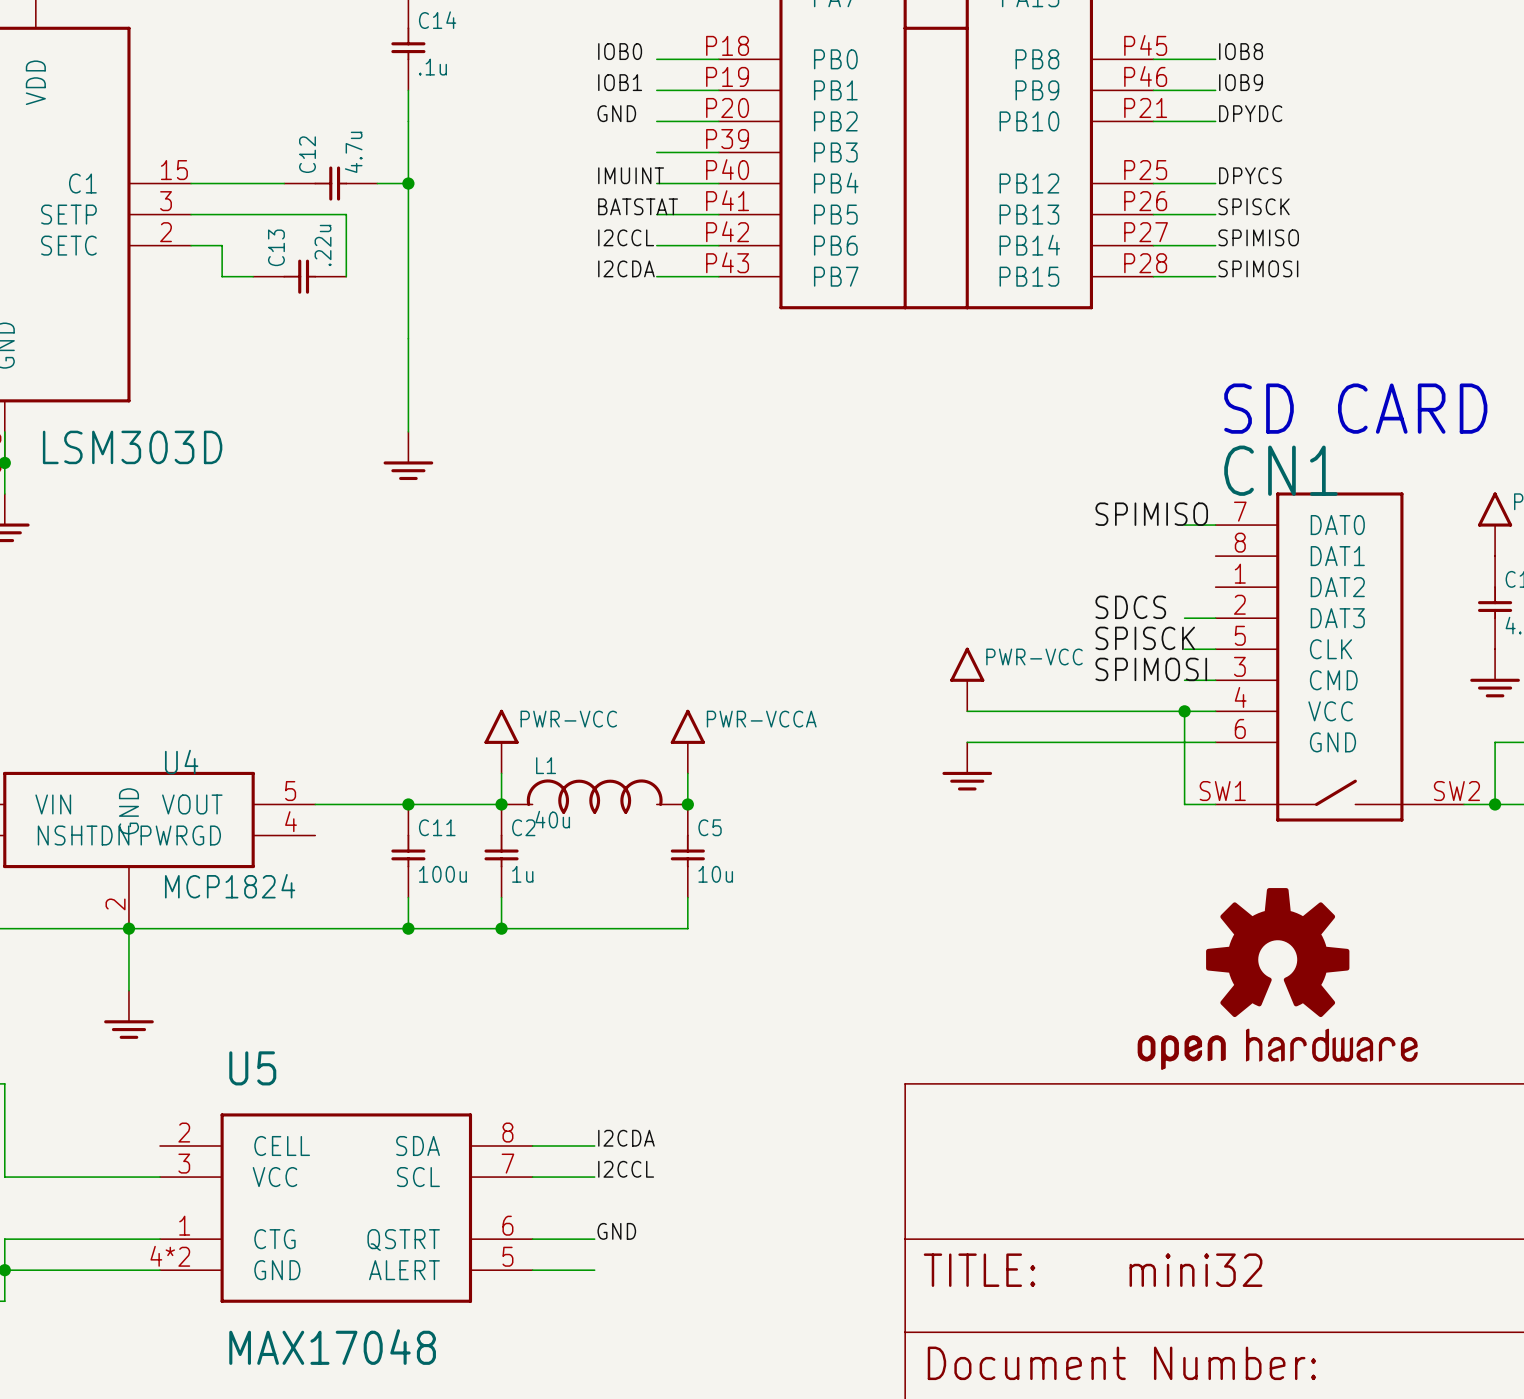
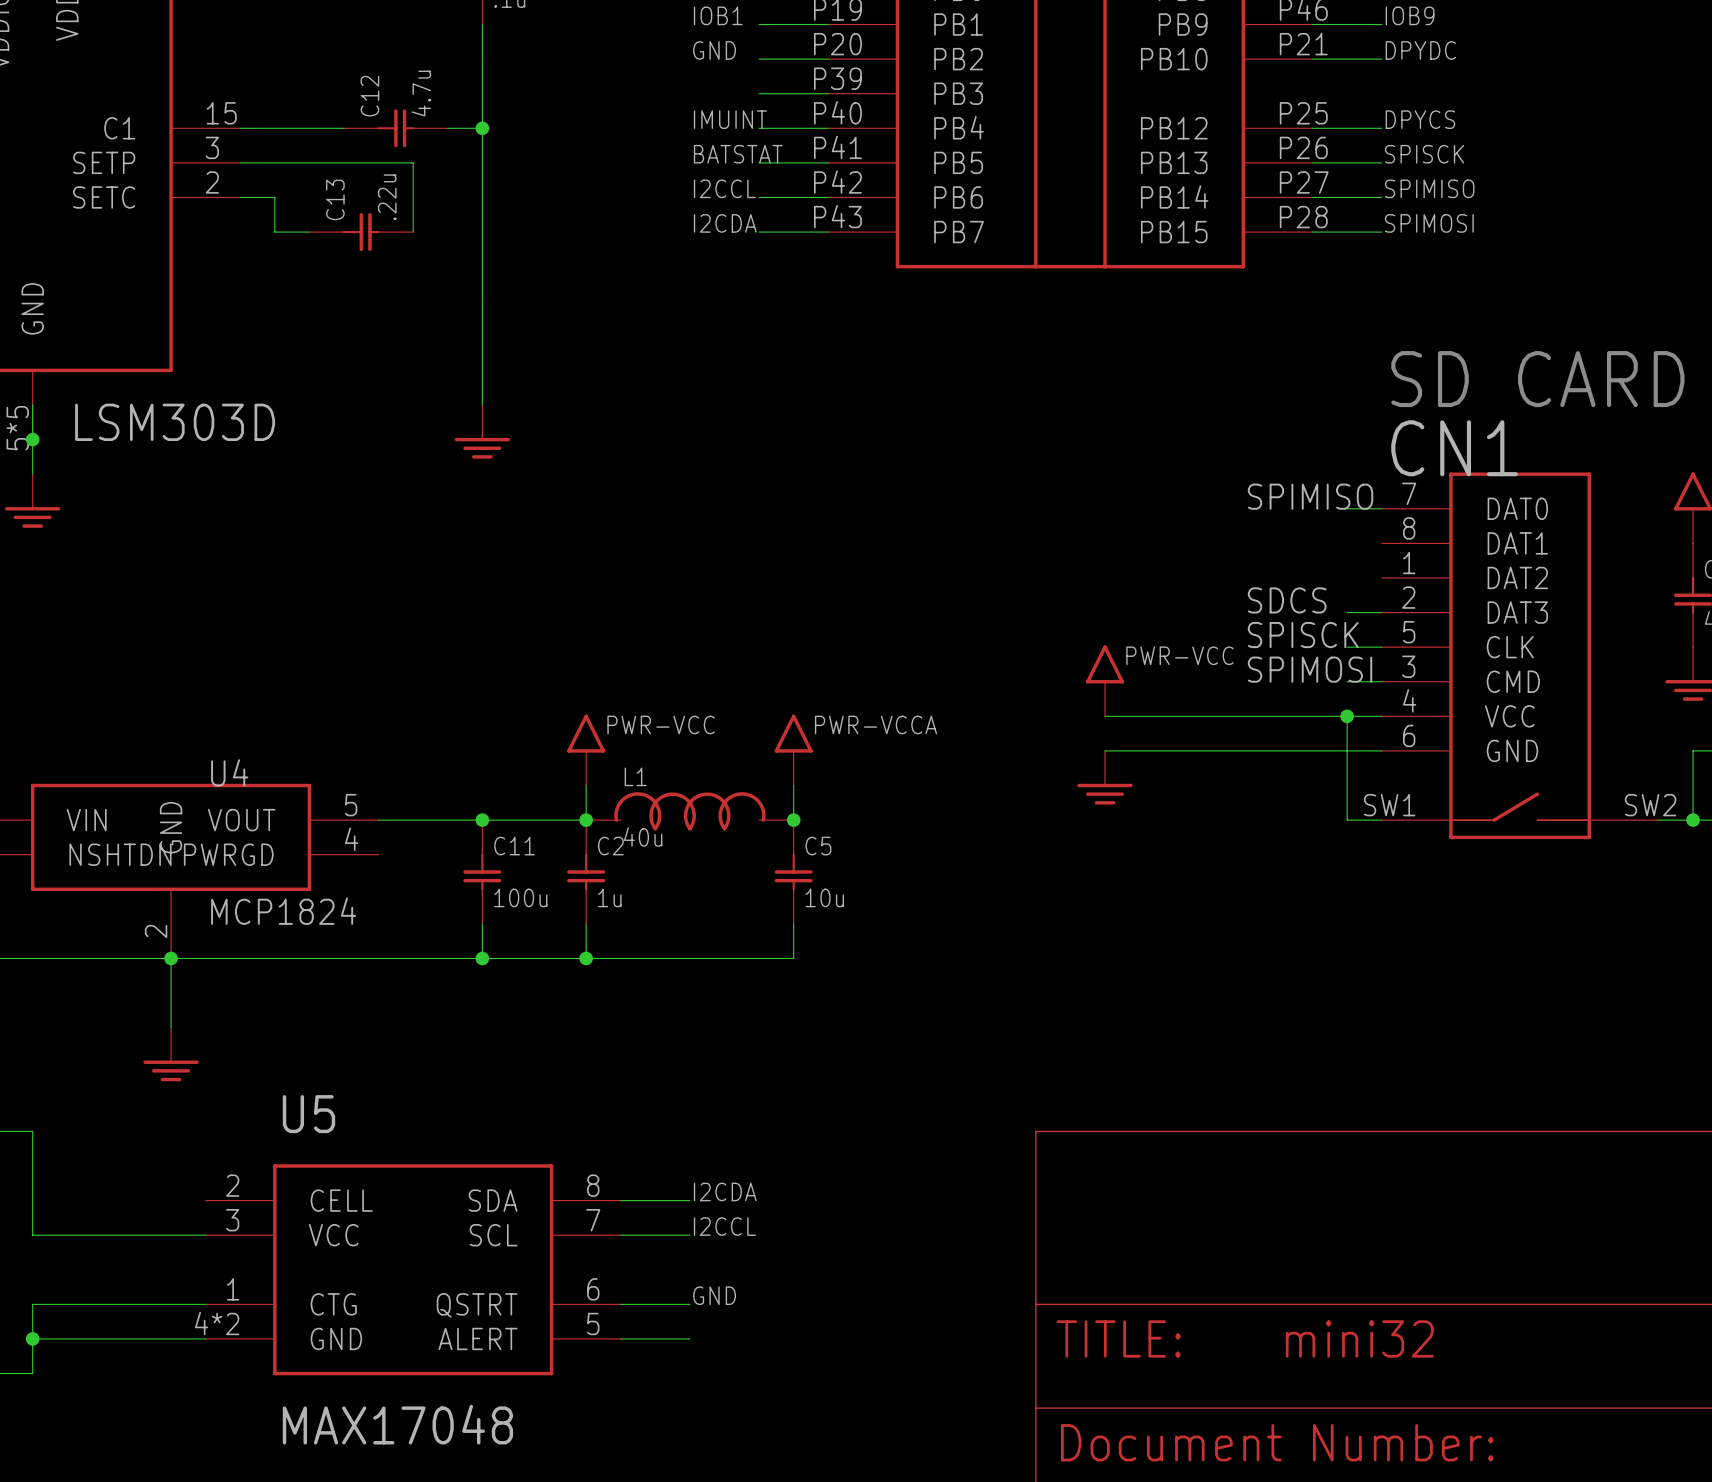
part: (1277, 978) -> none

